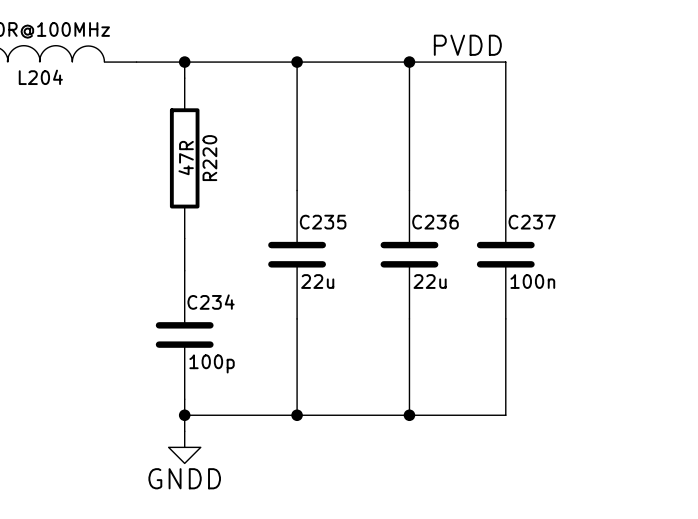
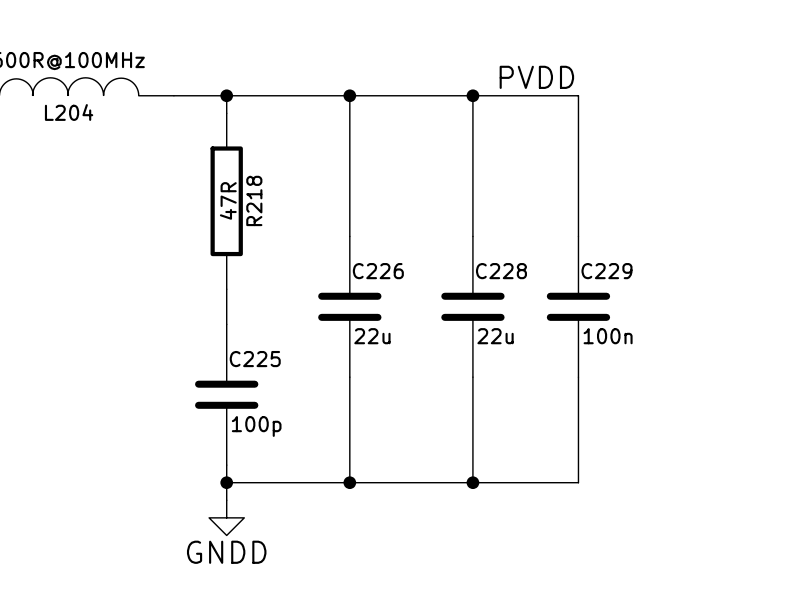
R220 name: R220 (209, 158) -> R218 (254, 200)
C235 name: C235 (323, 222) -> C226 (378, 271)
C236 name: C236 (435, 222) -> C228 (501, 271)
C237 name: C237 (532, 222) -> C229 (606, 271)
C234 name: C234 (211, 302) -> C225 (255, 359)

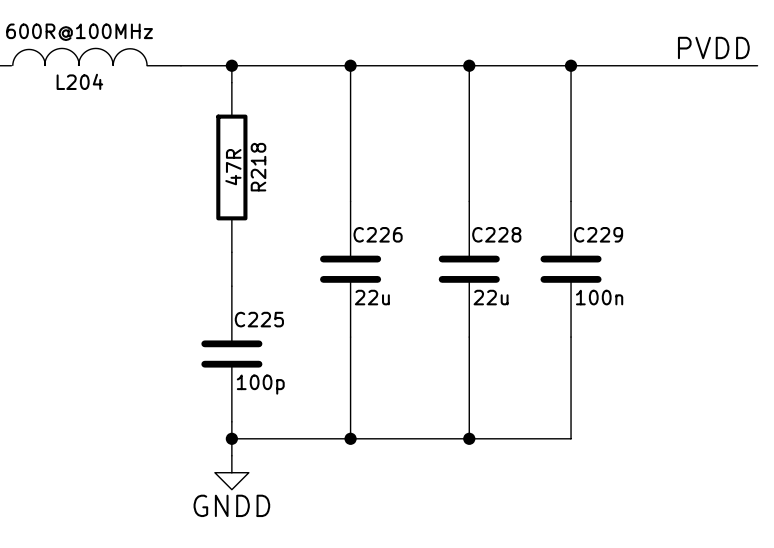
label position: PVDD (536, 77) -> PVDD (713, 47)
wire: none -> (571, 65) (757, 65)
junction: none -> (571, 65)

